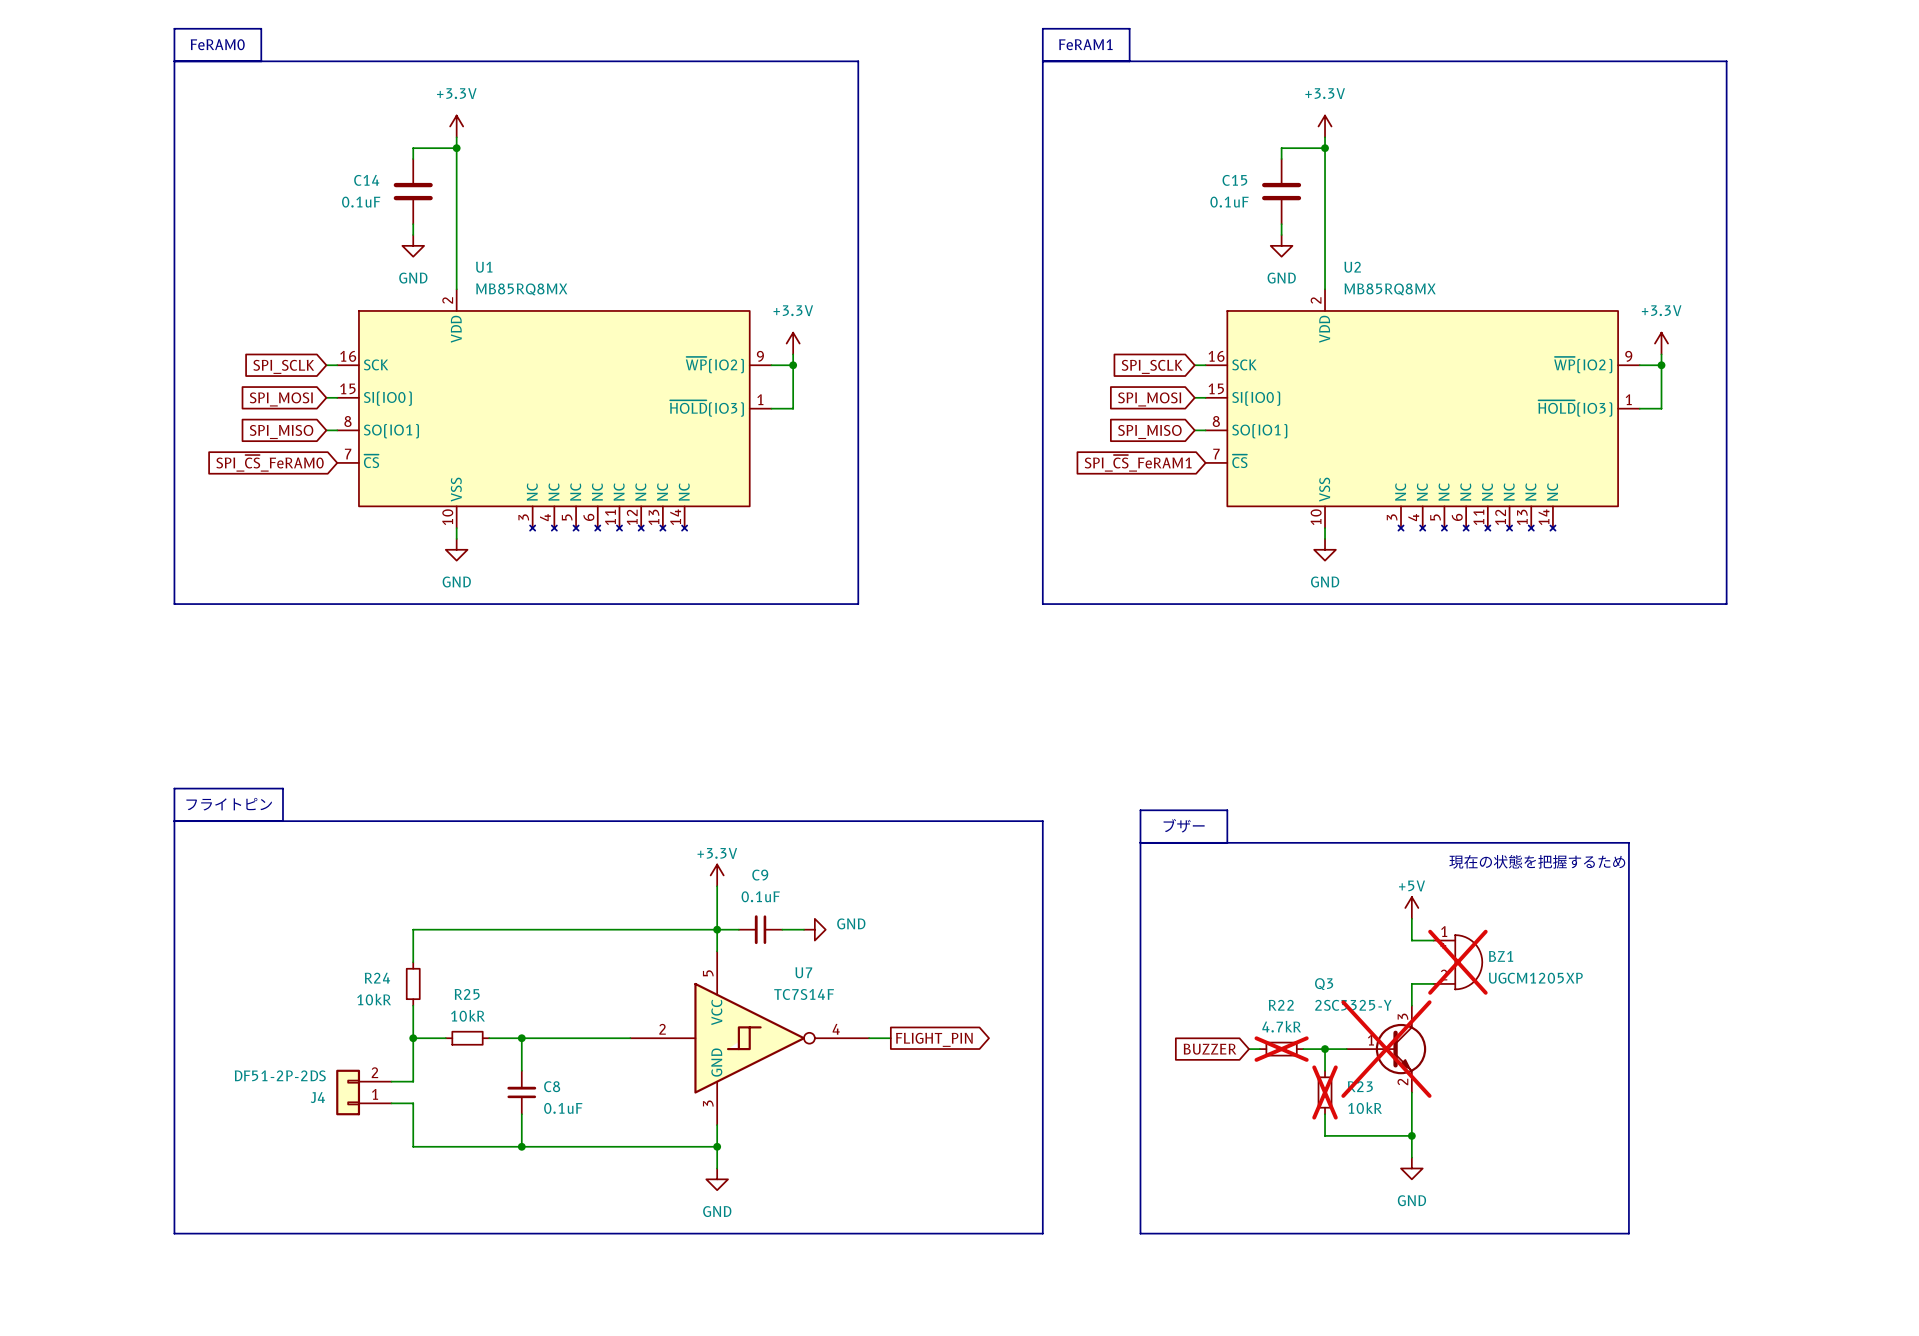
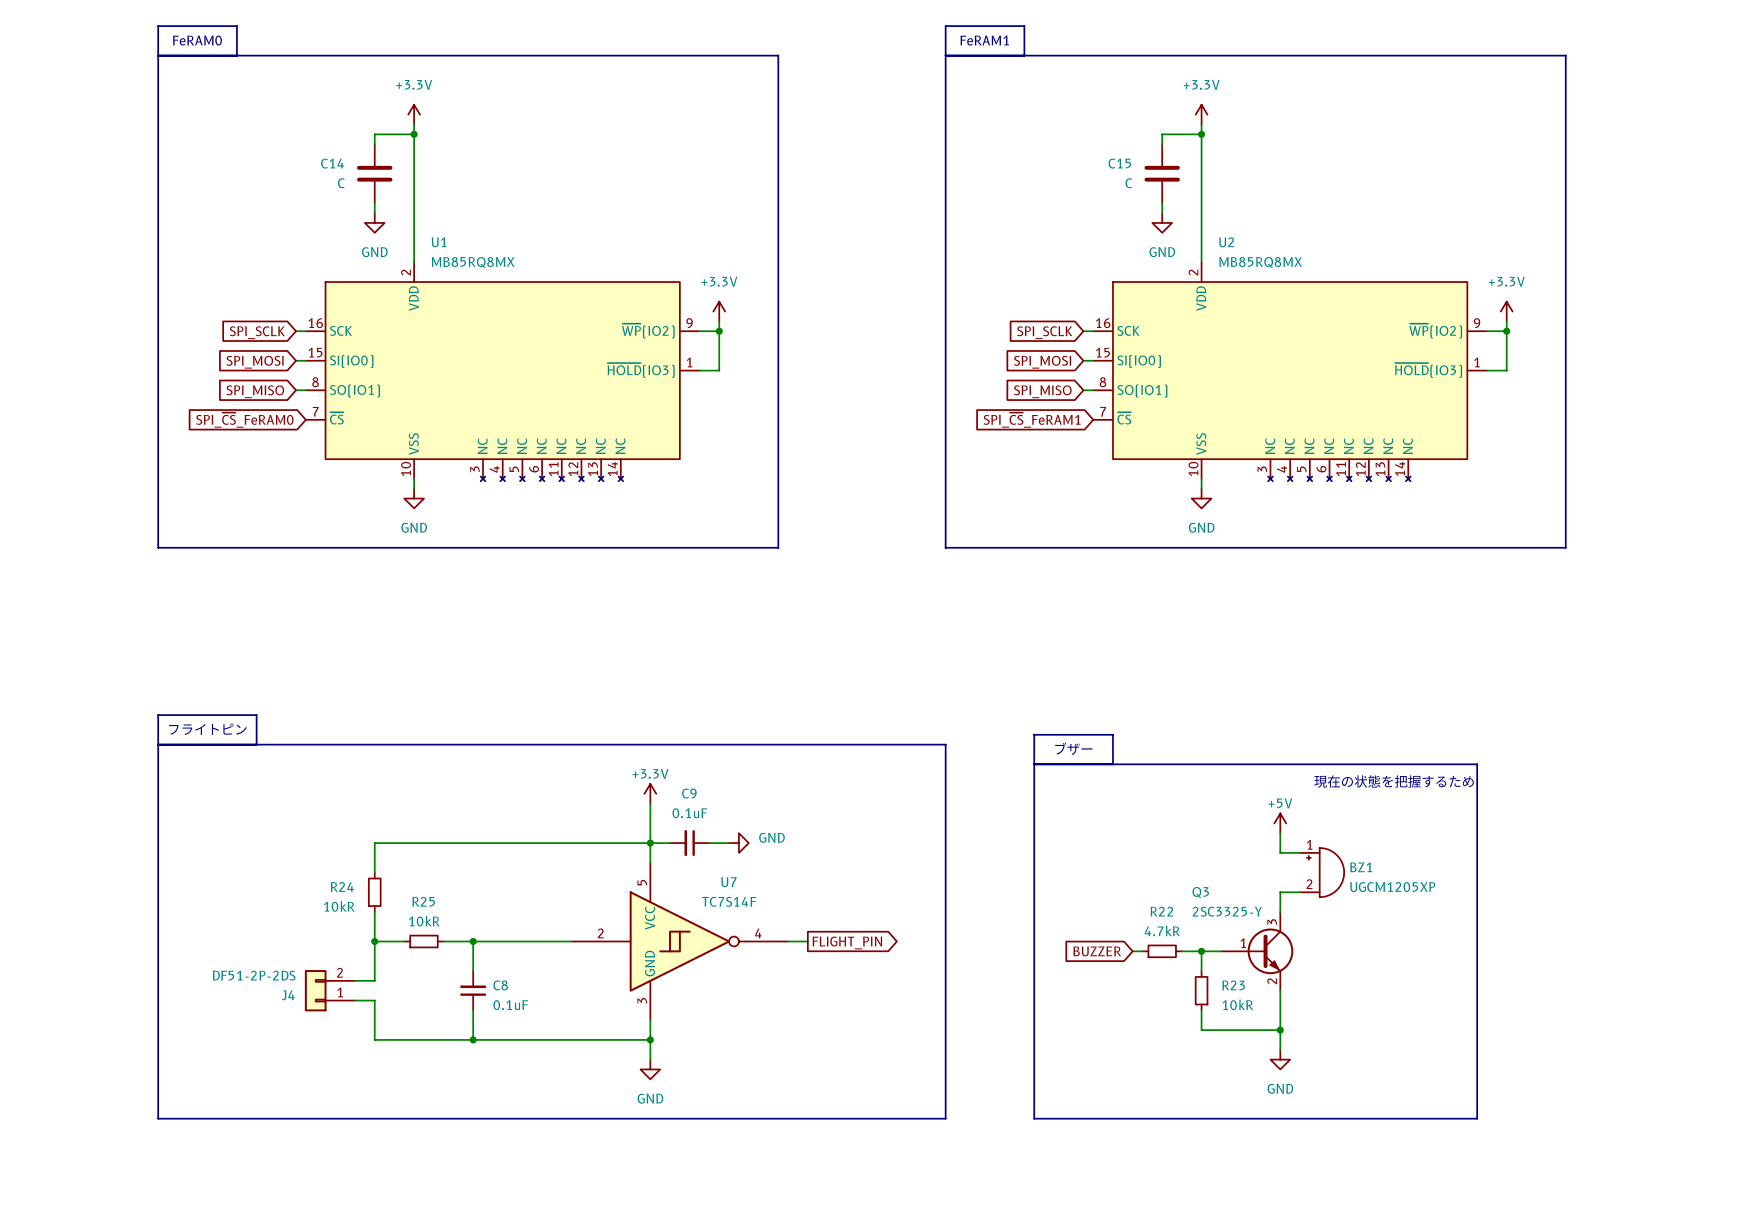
C14 value: 0.1uF (361, 202) -> C (341, 183)
C15 value: 0.1uF (1229, 202) -> C (1128, 183)
BZ1 do-not-place cross: (1457, 962) -> none
R22 do-not-place cross: (1281, 1049) -> none
Q3 do-not-place cross: (1386, 1049) -> none
R23 do-not-place cross: (1325, 1092) -> none

